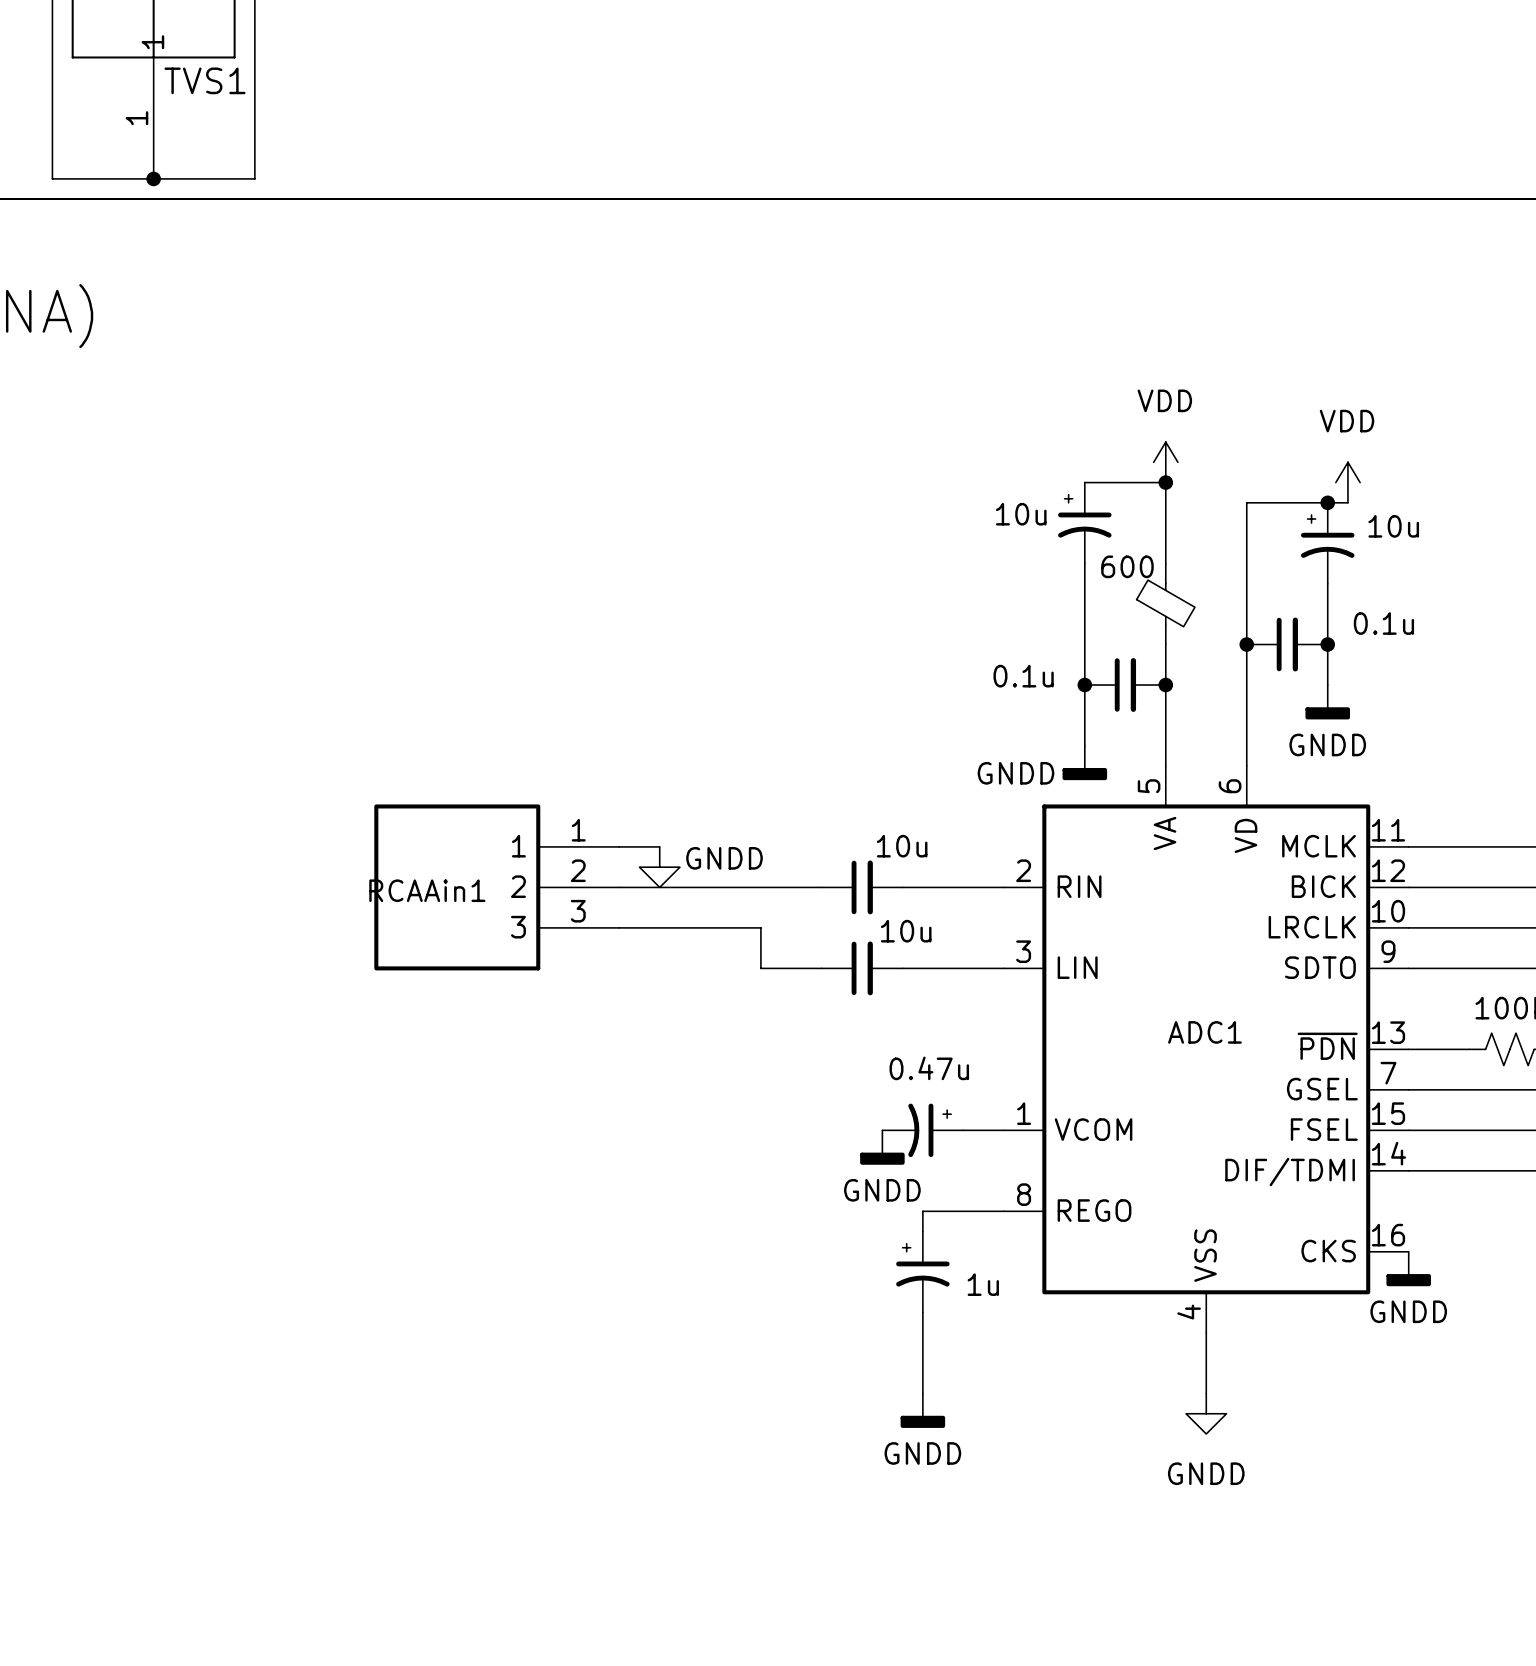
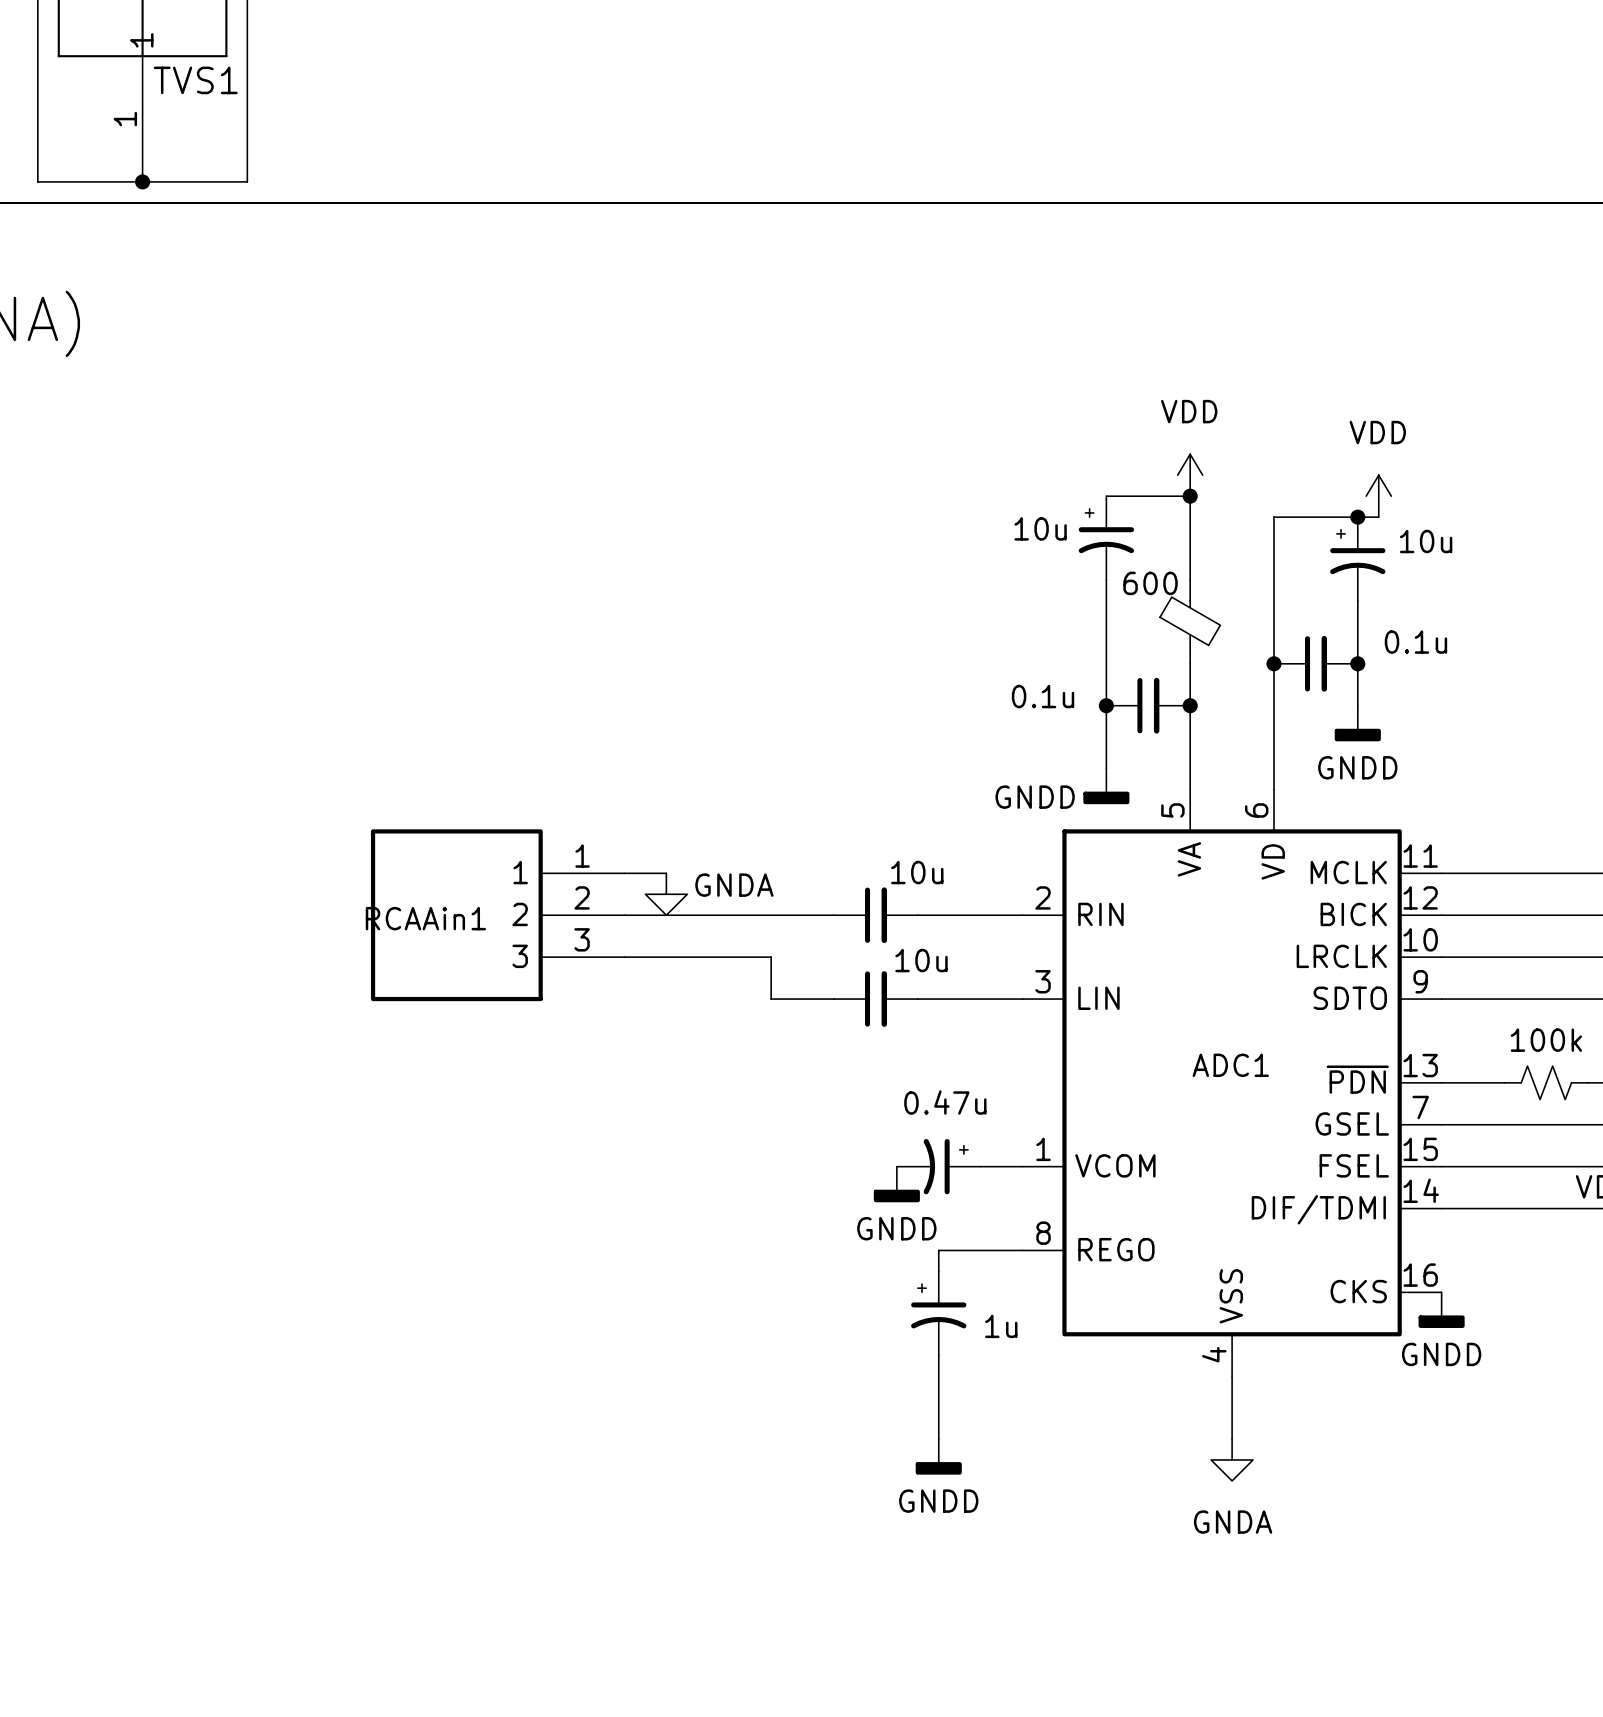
power symbol: GNDD (659, 867) -> GNDA (666, 894)
power symbol: GNDD (1206, 1413) -> GNDA (1232, 1459)

